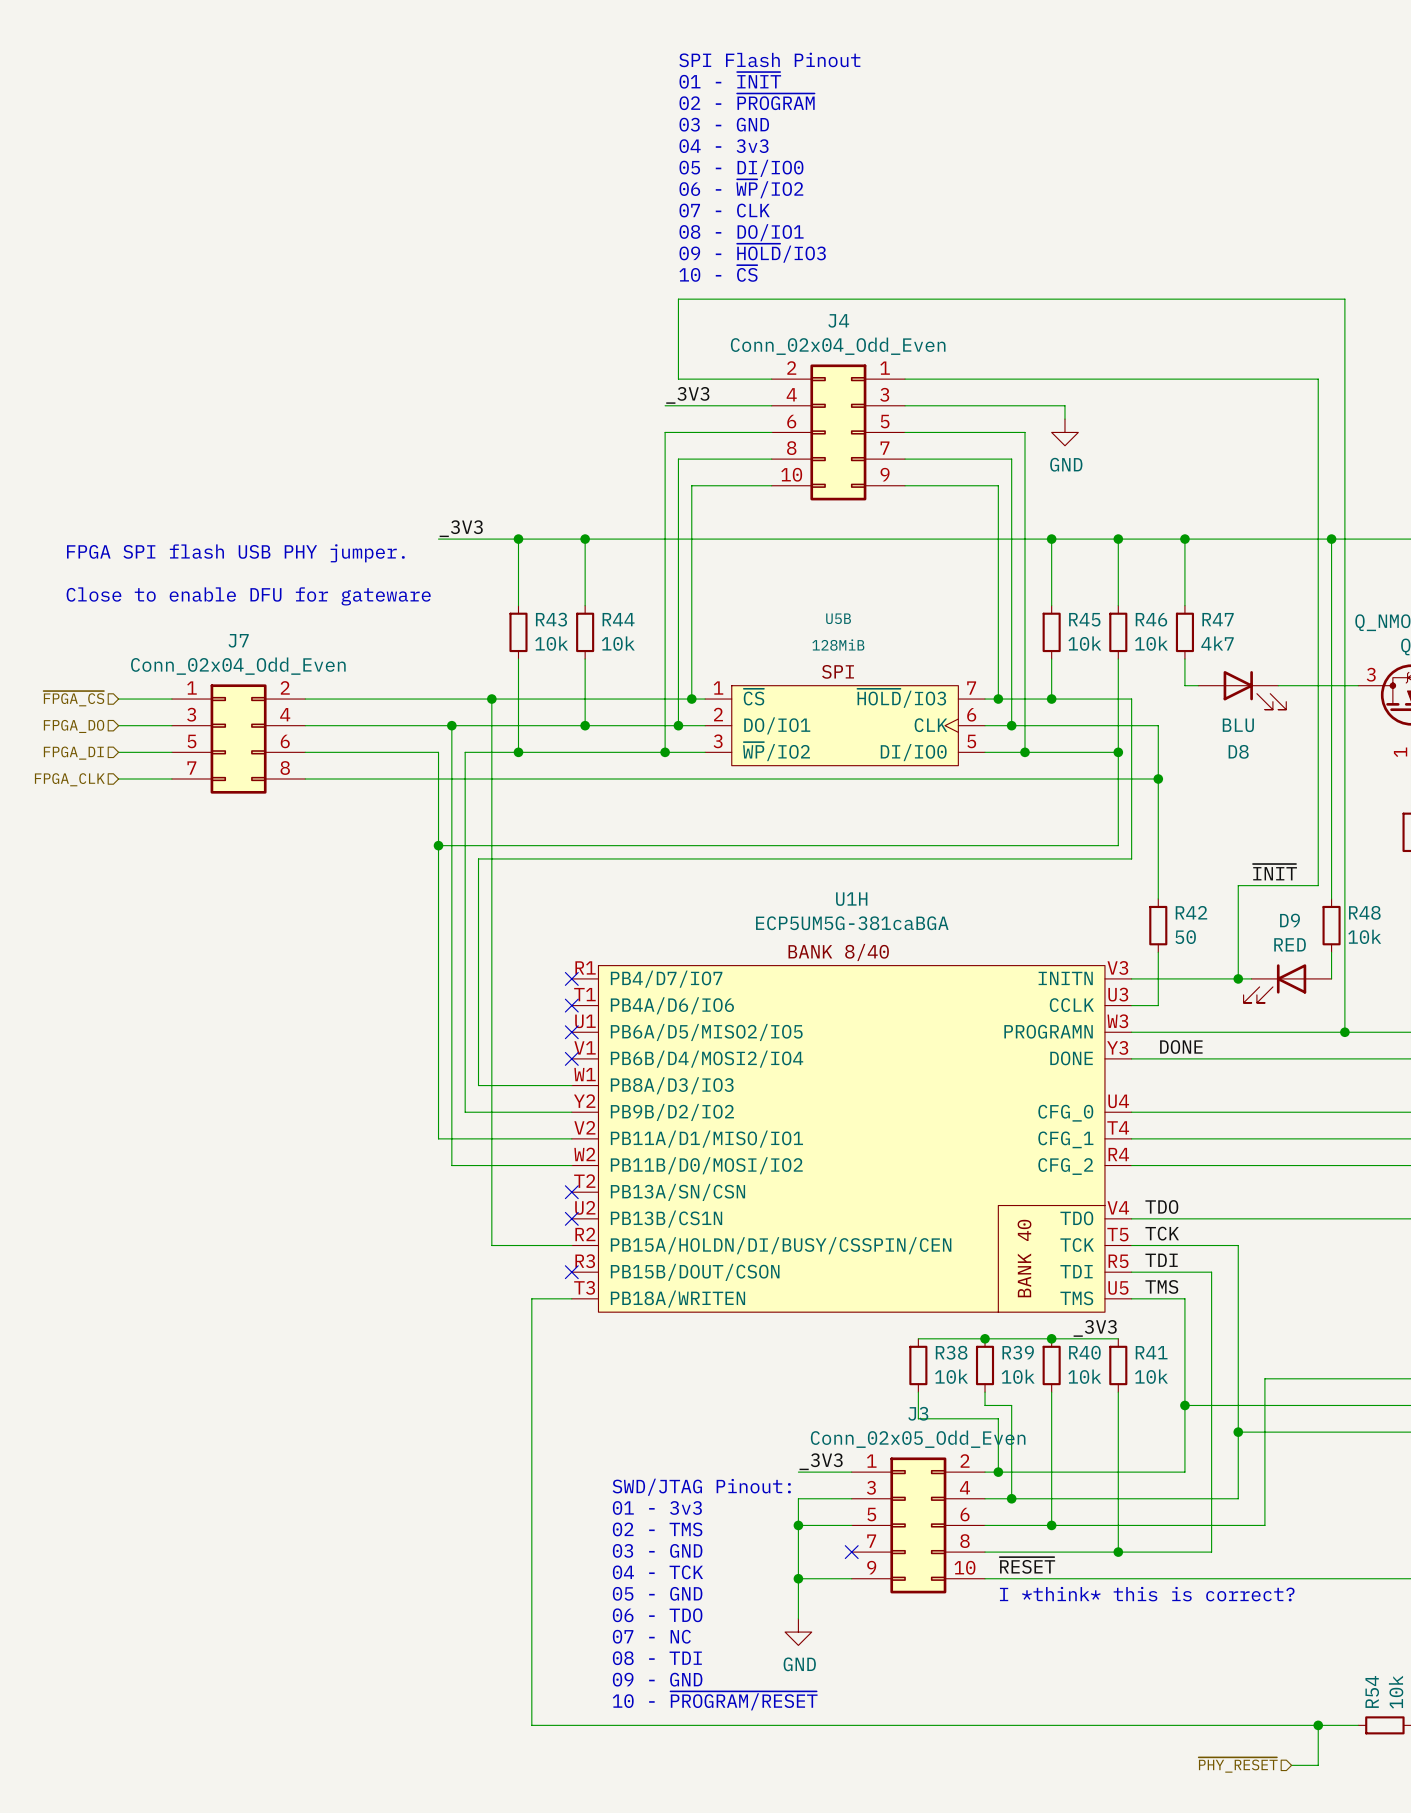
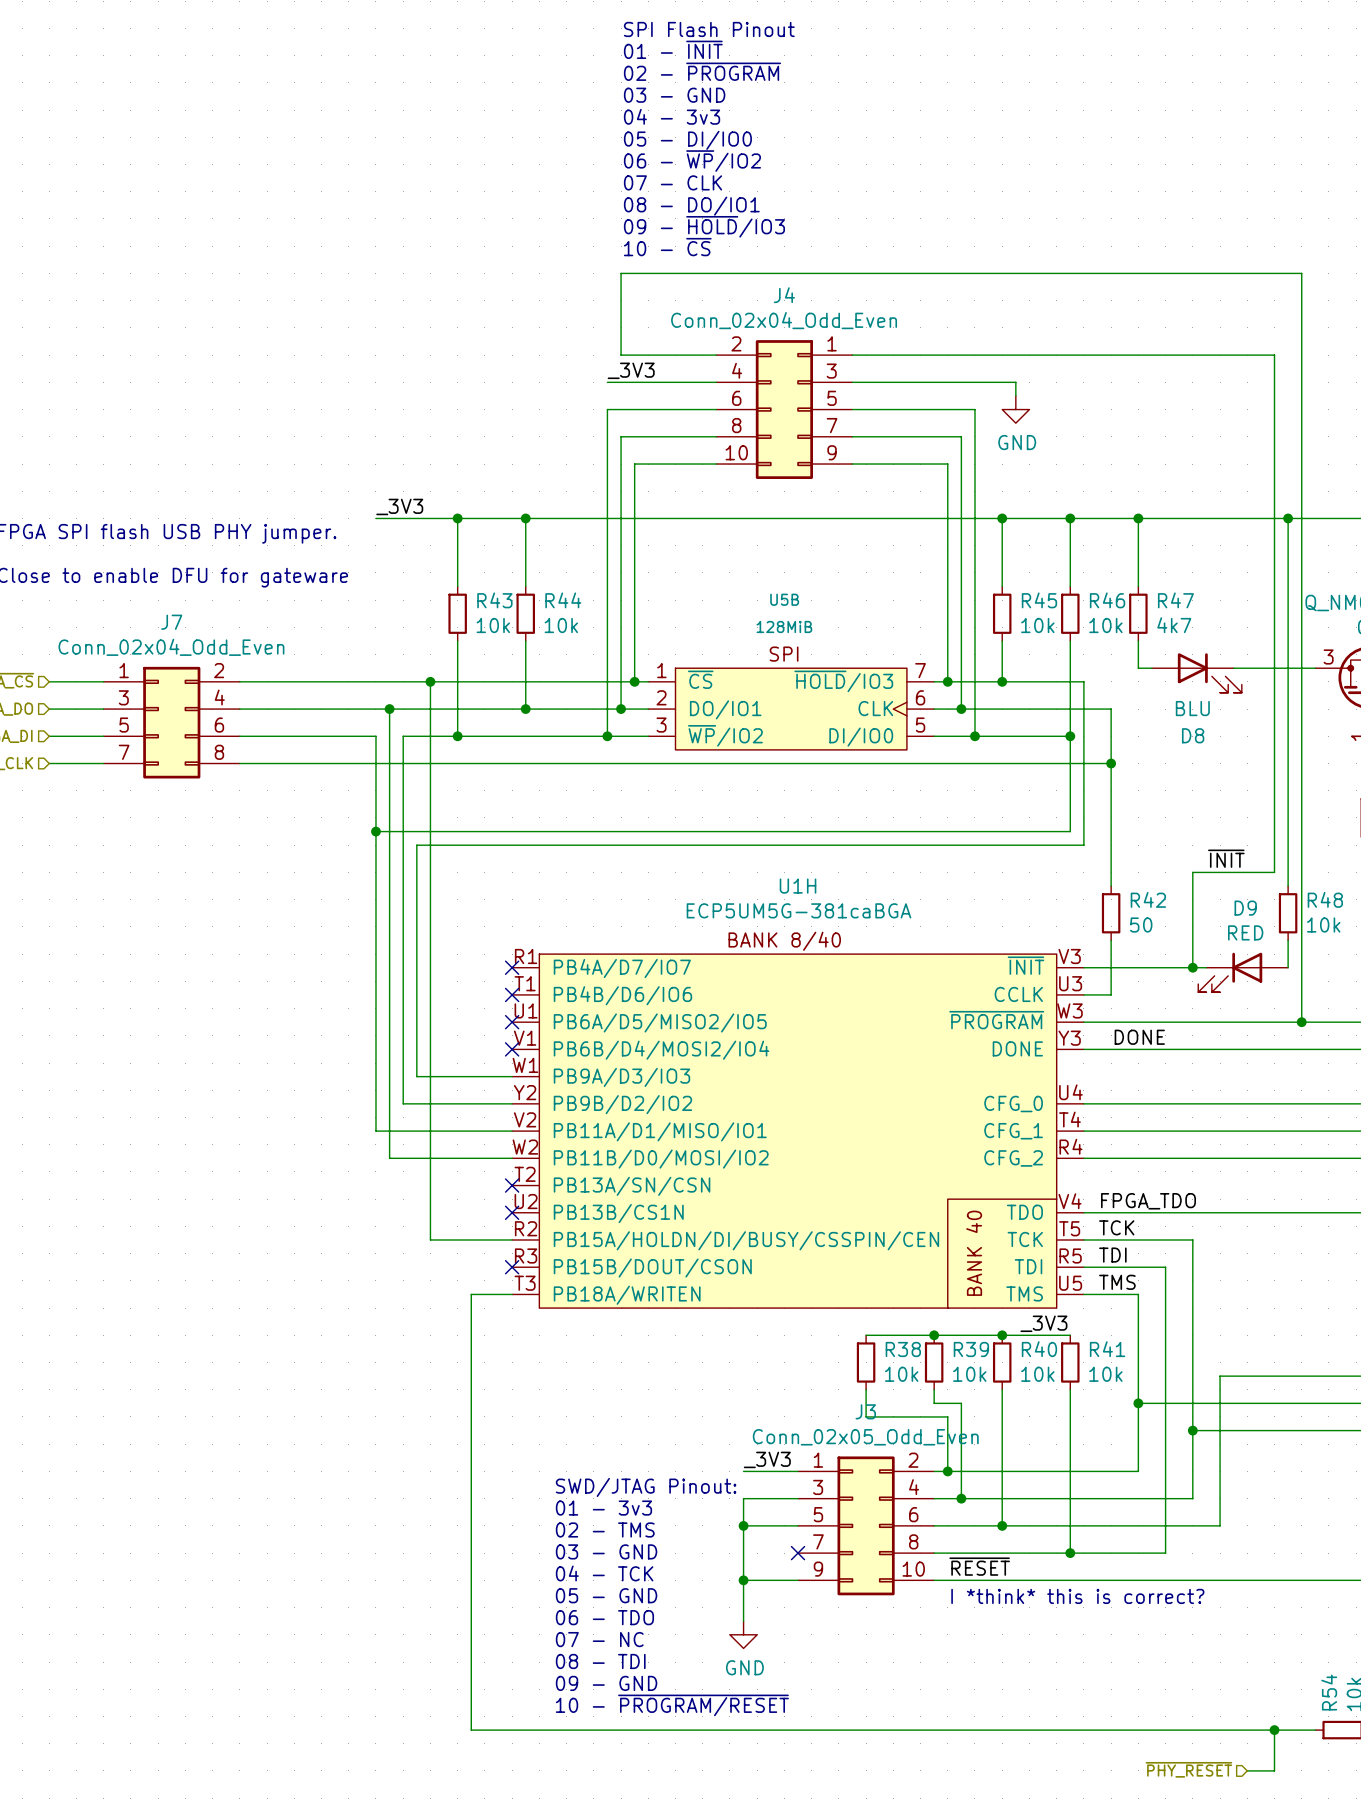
U1H pin name: INITN (1065, 978) -> ~{INIT} (1025, 965)
U1H pin name: PB4/D7/IO7 (666, 979) -> PB4A/D7/IO7 (622, 968)
U1H pin name: PB4A/D6/IO6 (672, 1005) -> PB4B/D6/IO6 (622, 995)
U1H pin name: PROGRAMN (1048, 1031) -> ~{PROGRAM} (996, 1020)
U1H pin name: PB8A/D3/IO3 (672, 1085) -> PB9A/D3/IO3 (621, 1077)
label: TDO (1161, 1206) -> FPGA_TDO (1148, 1201)

